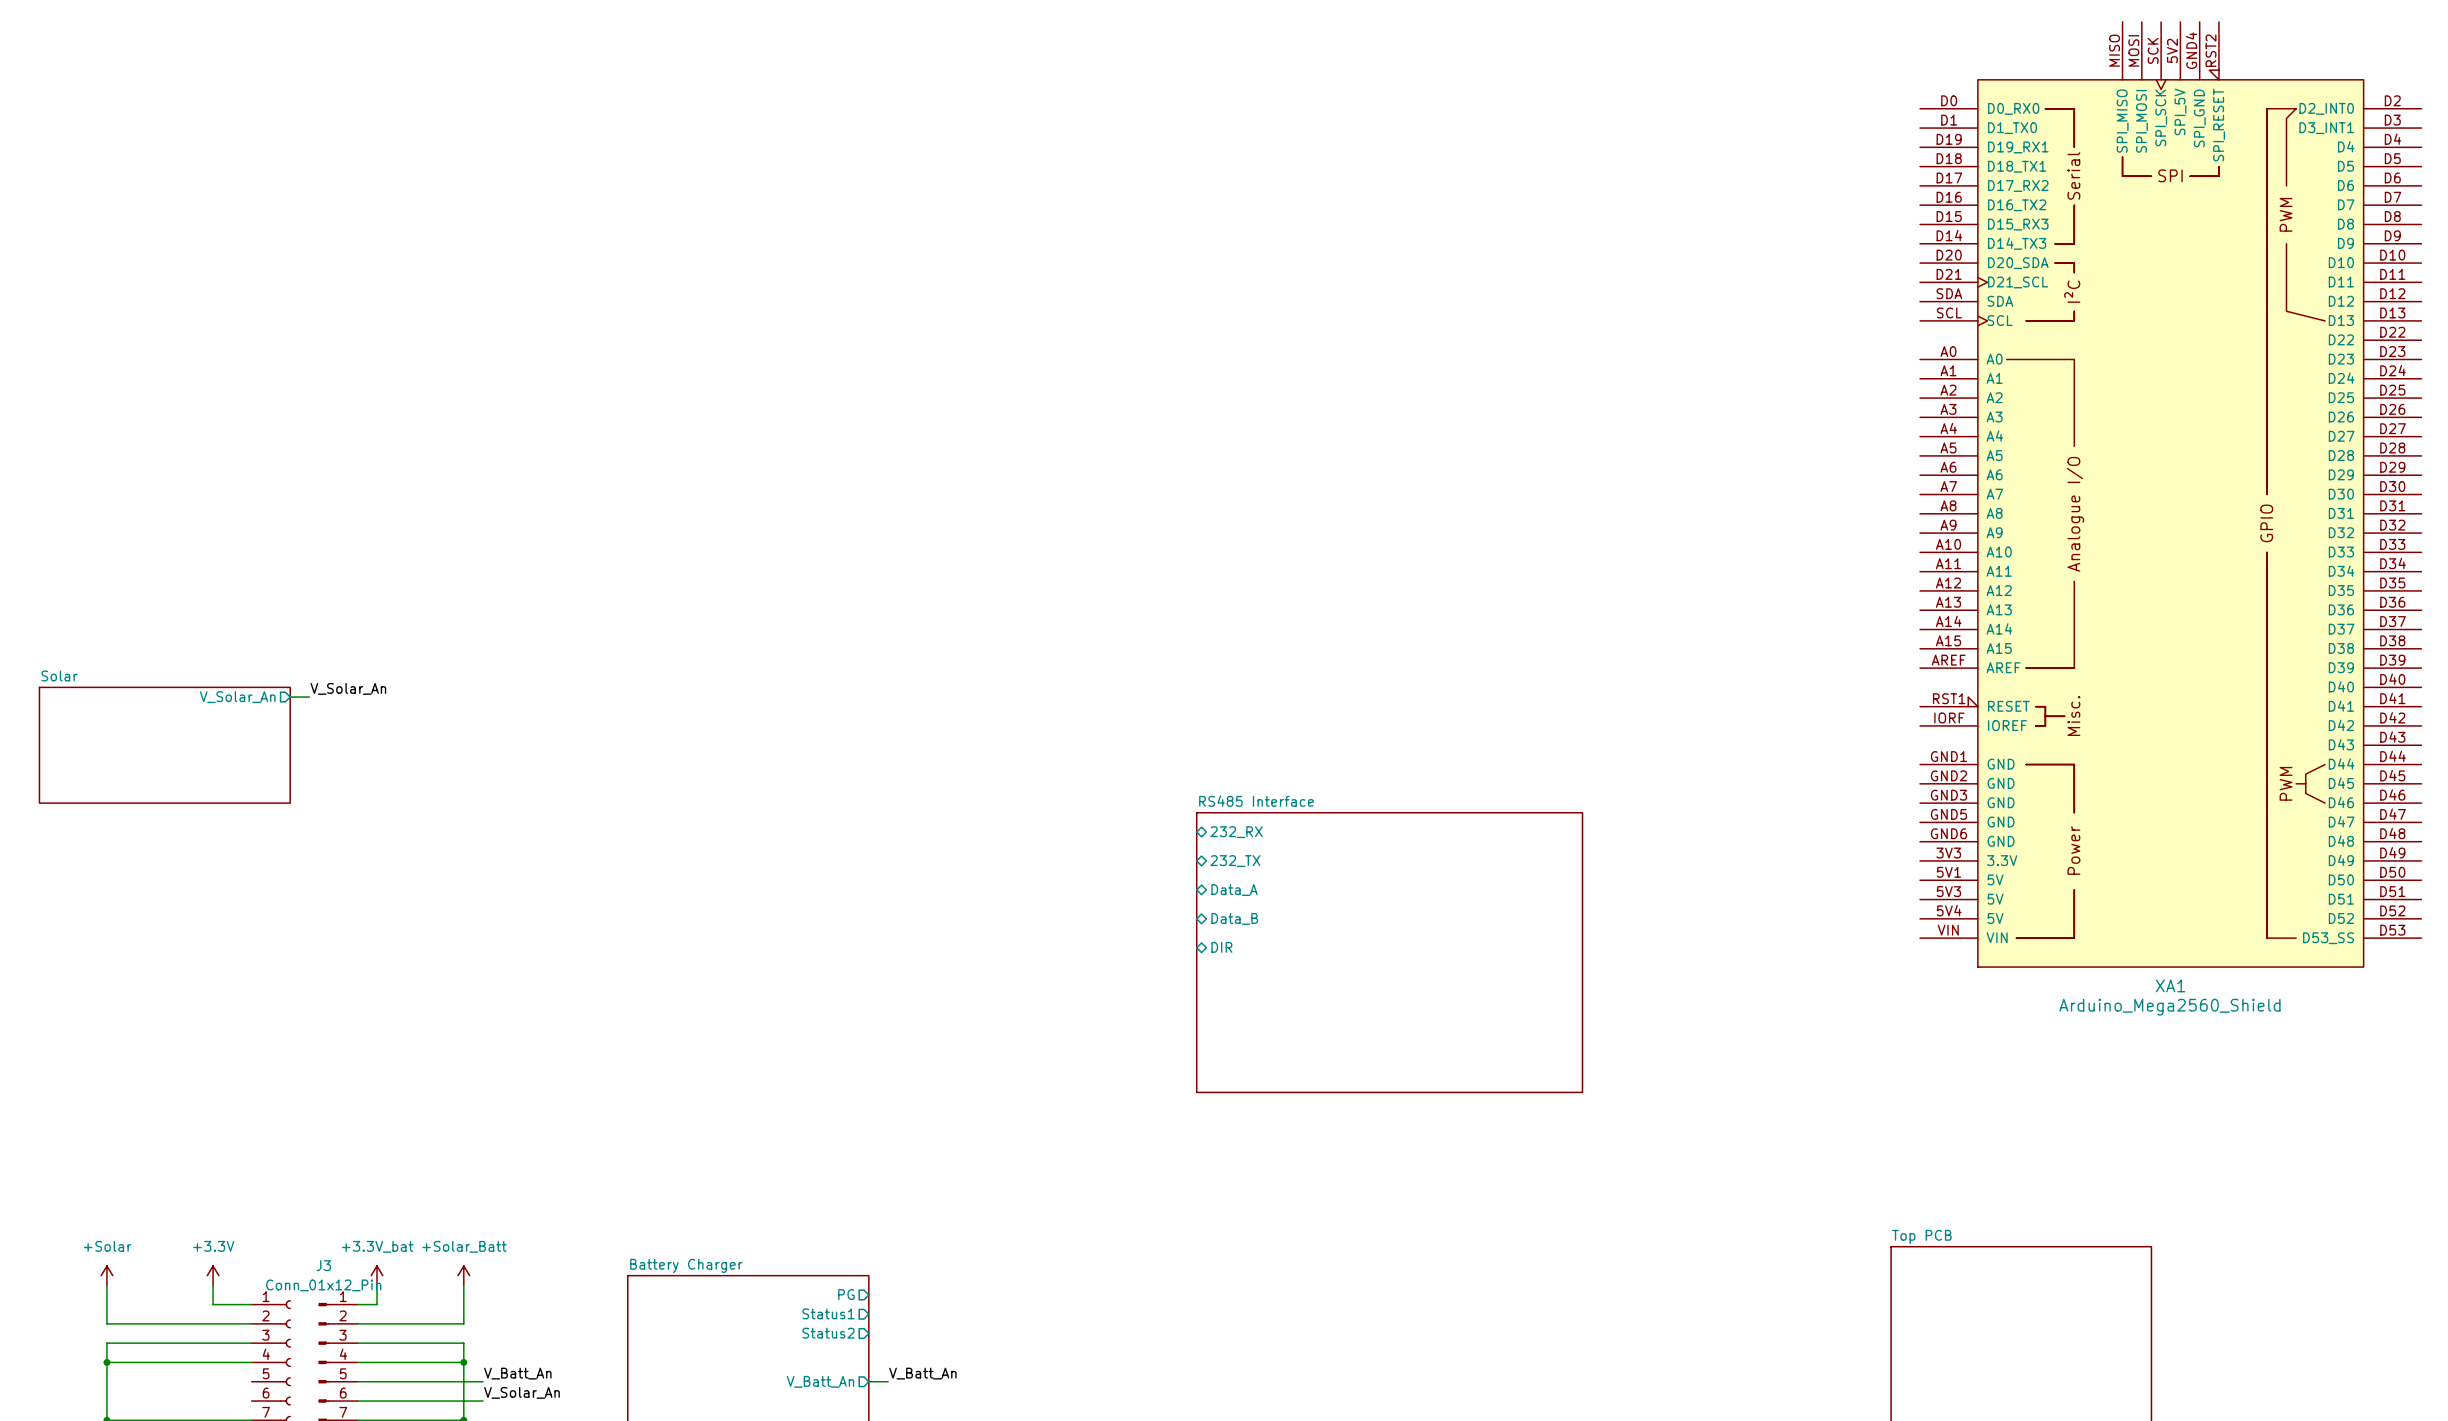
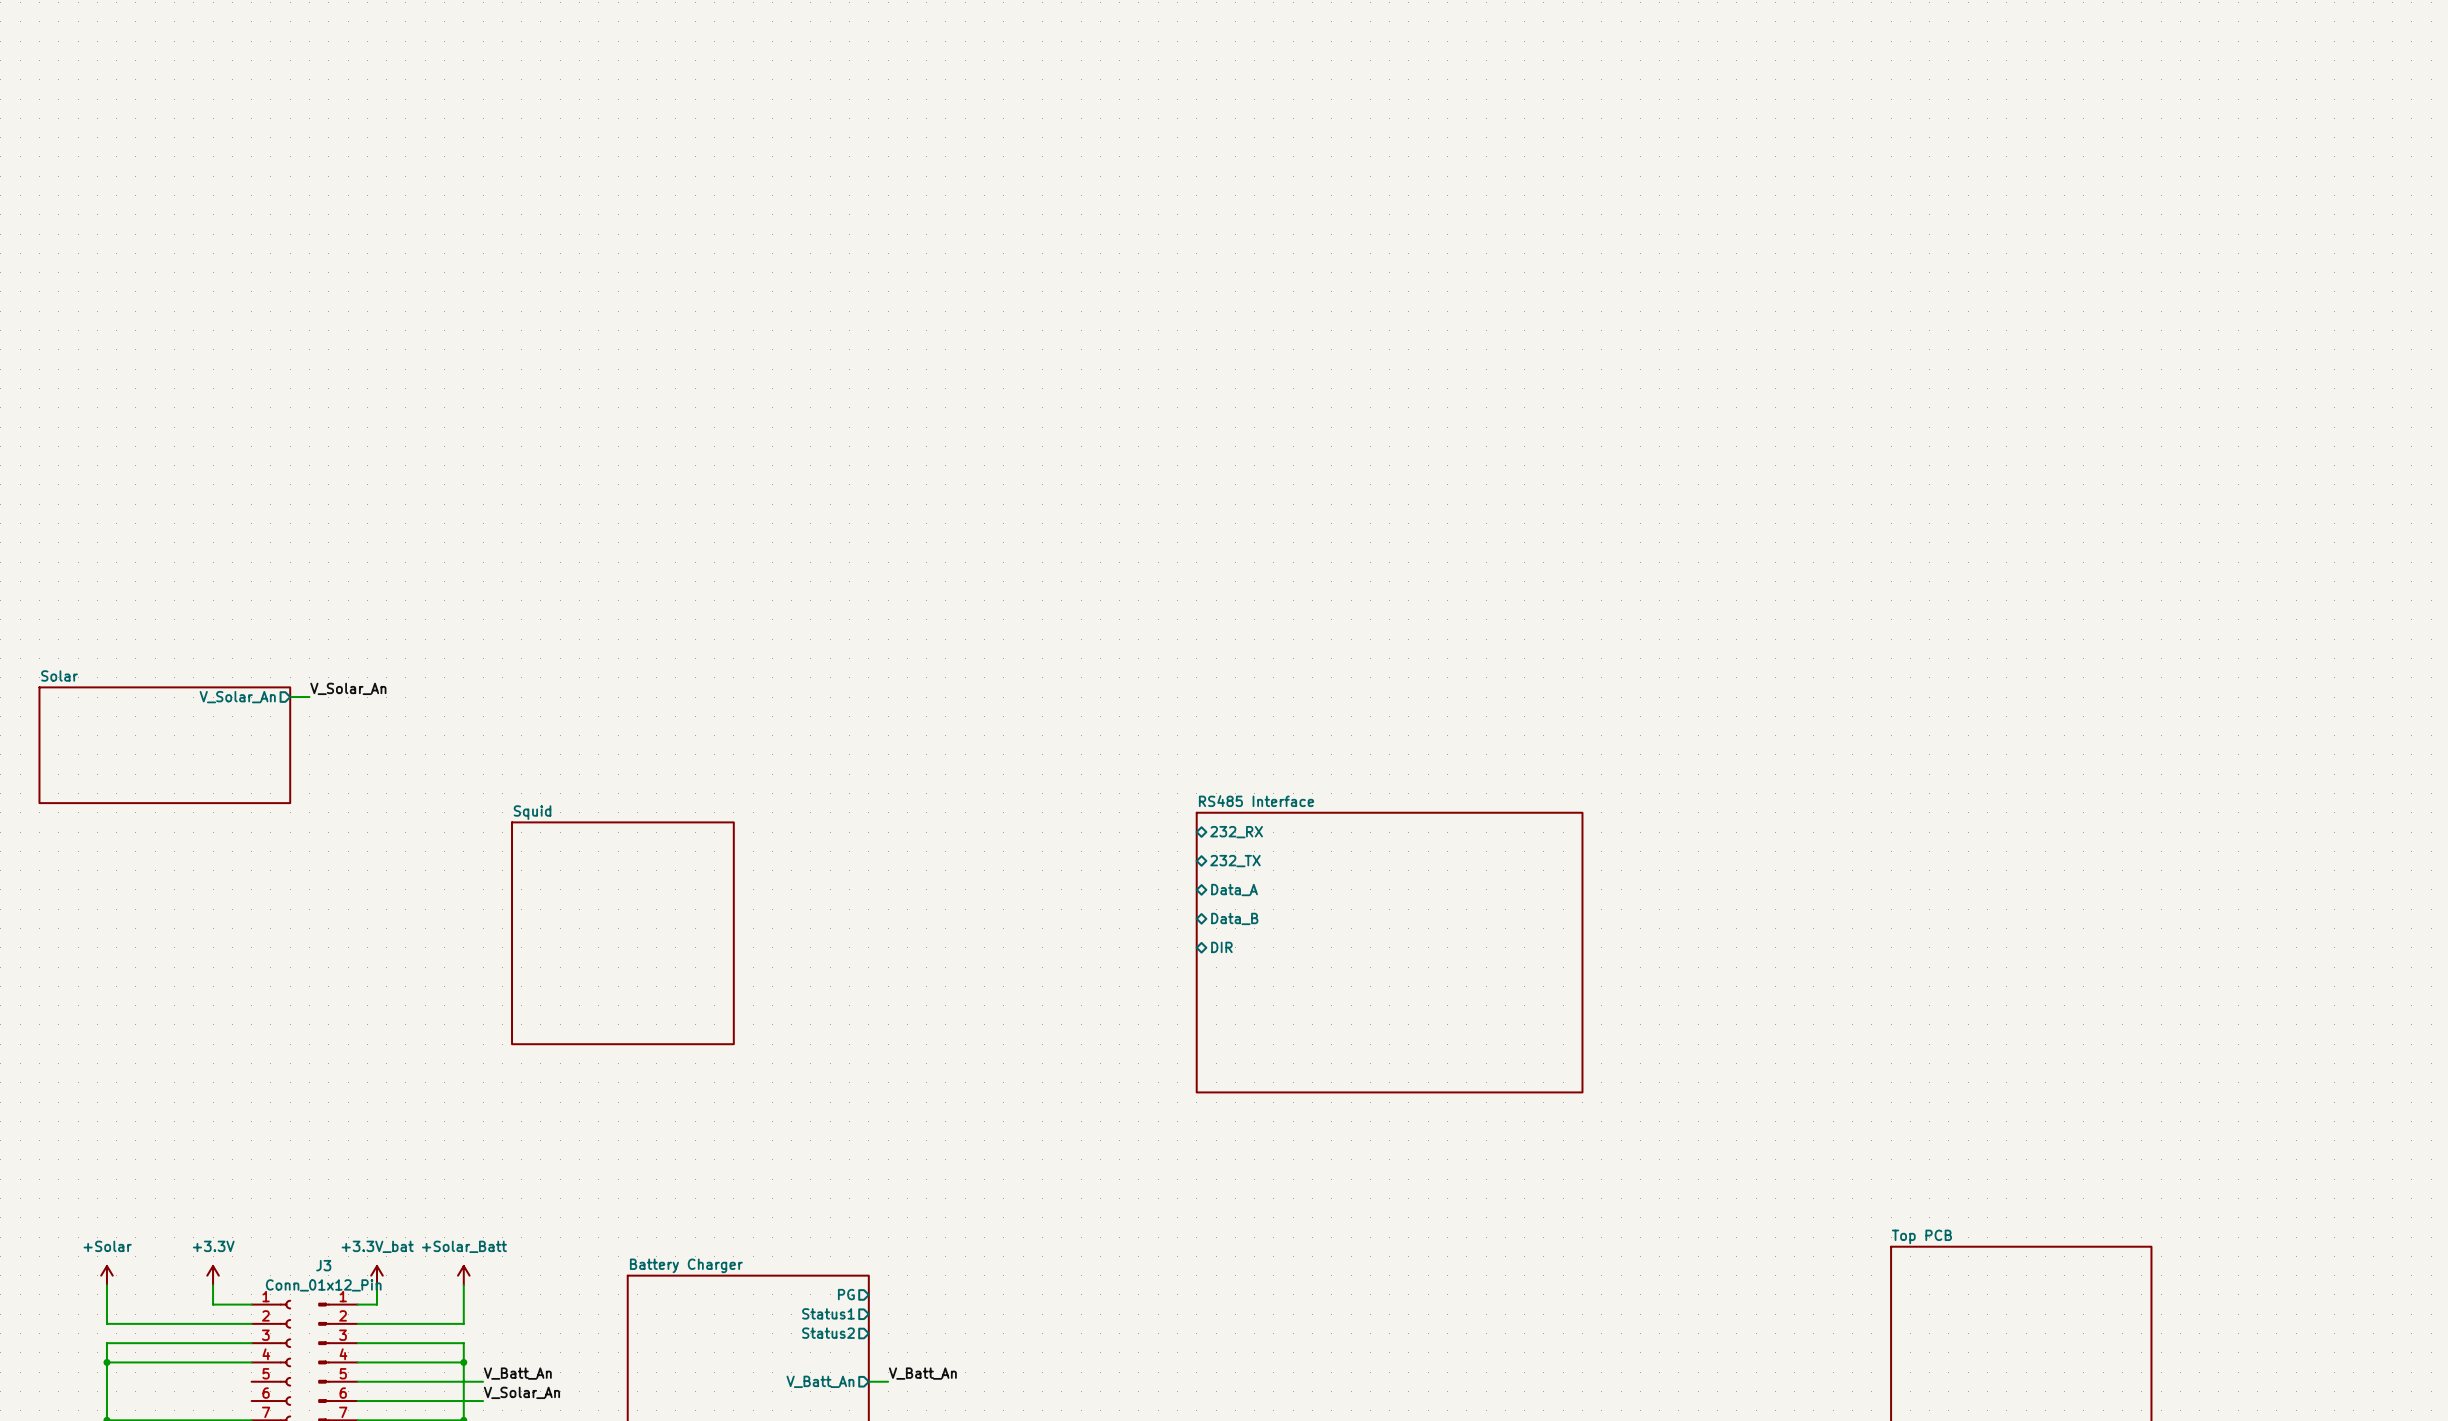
XA1: Arduino_Mega2560_Shield (2170, 494) -> none
sheet Squid: none -> (622, 933)

